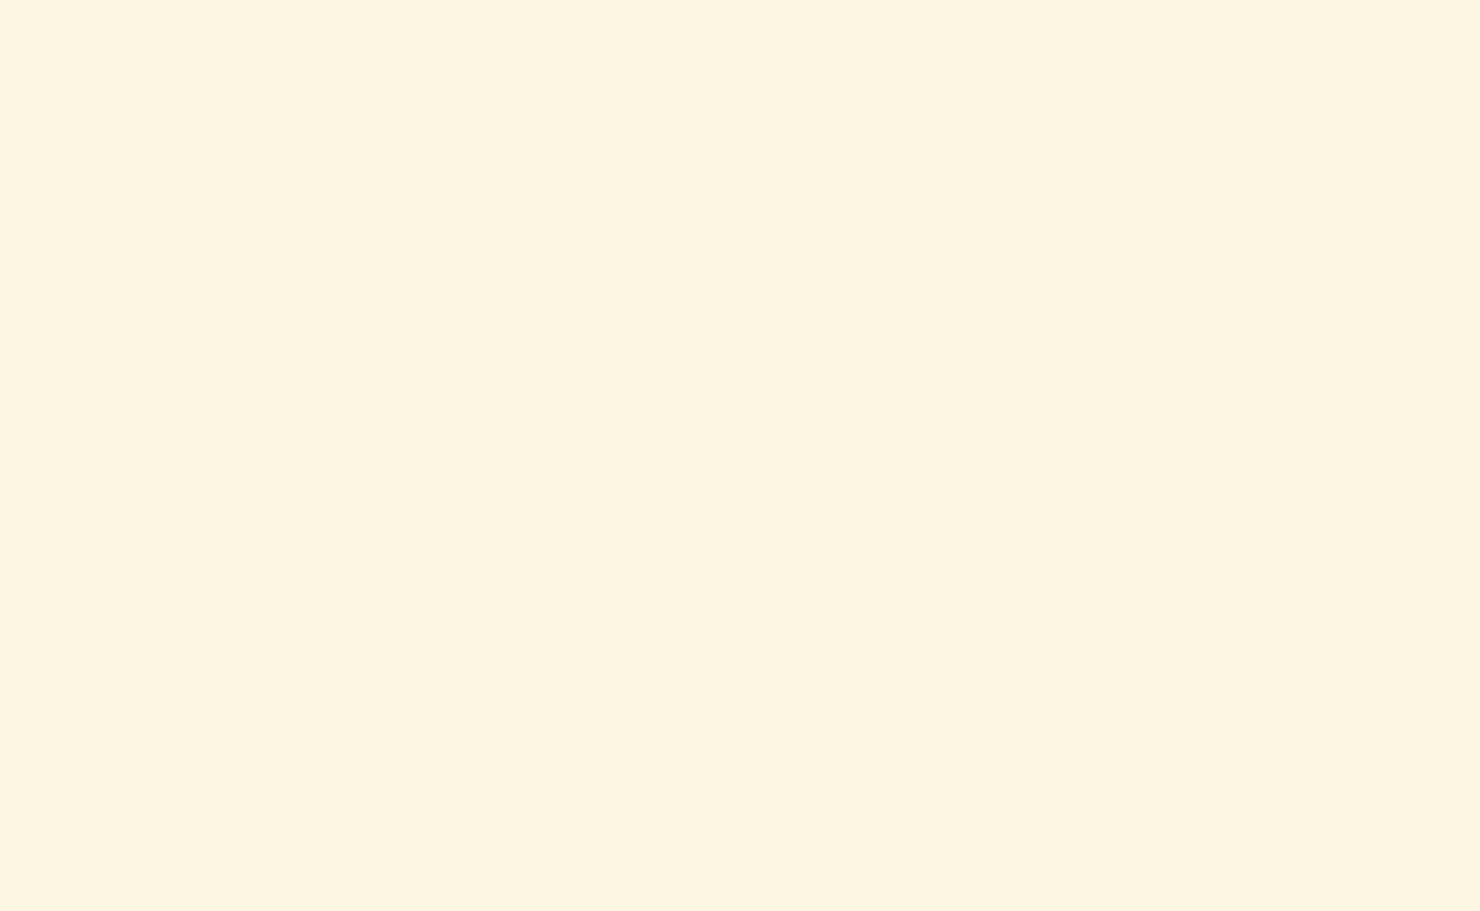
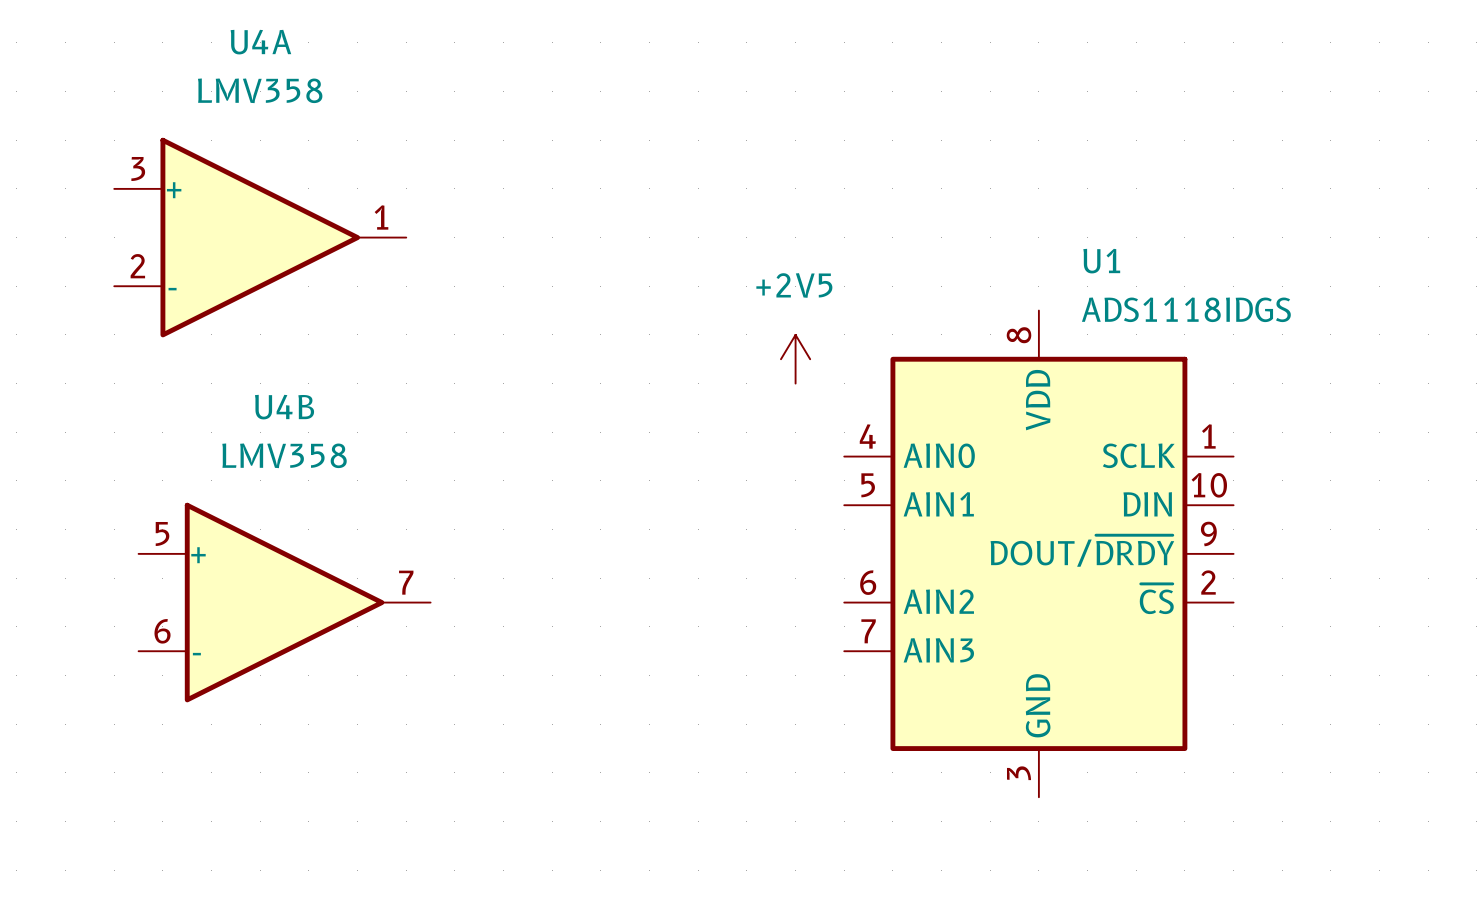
U4A: none -> LMV358 (260, 237)
power symbol: none -> +2V5 (795, 359)
U1: none -> ADS1118IDGS (1038, 553)
U4B: none -> LMV358 (284, 602)

